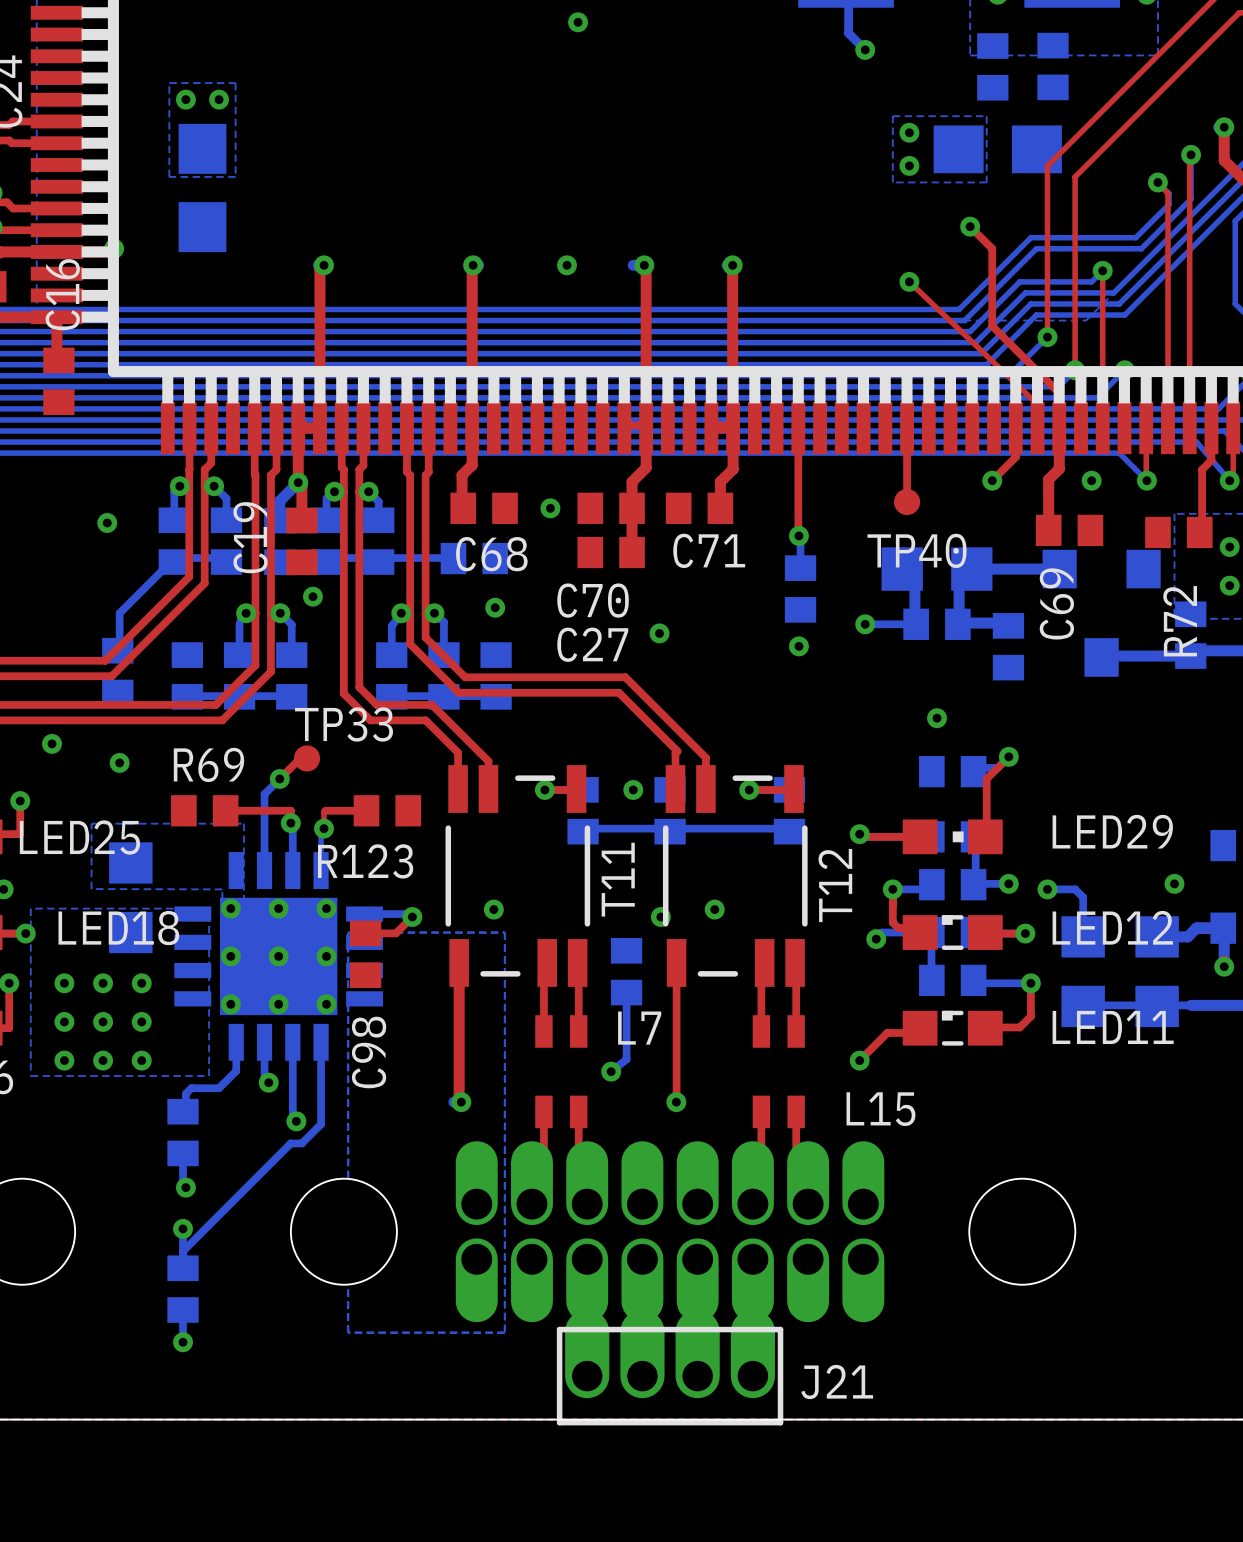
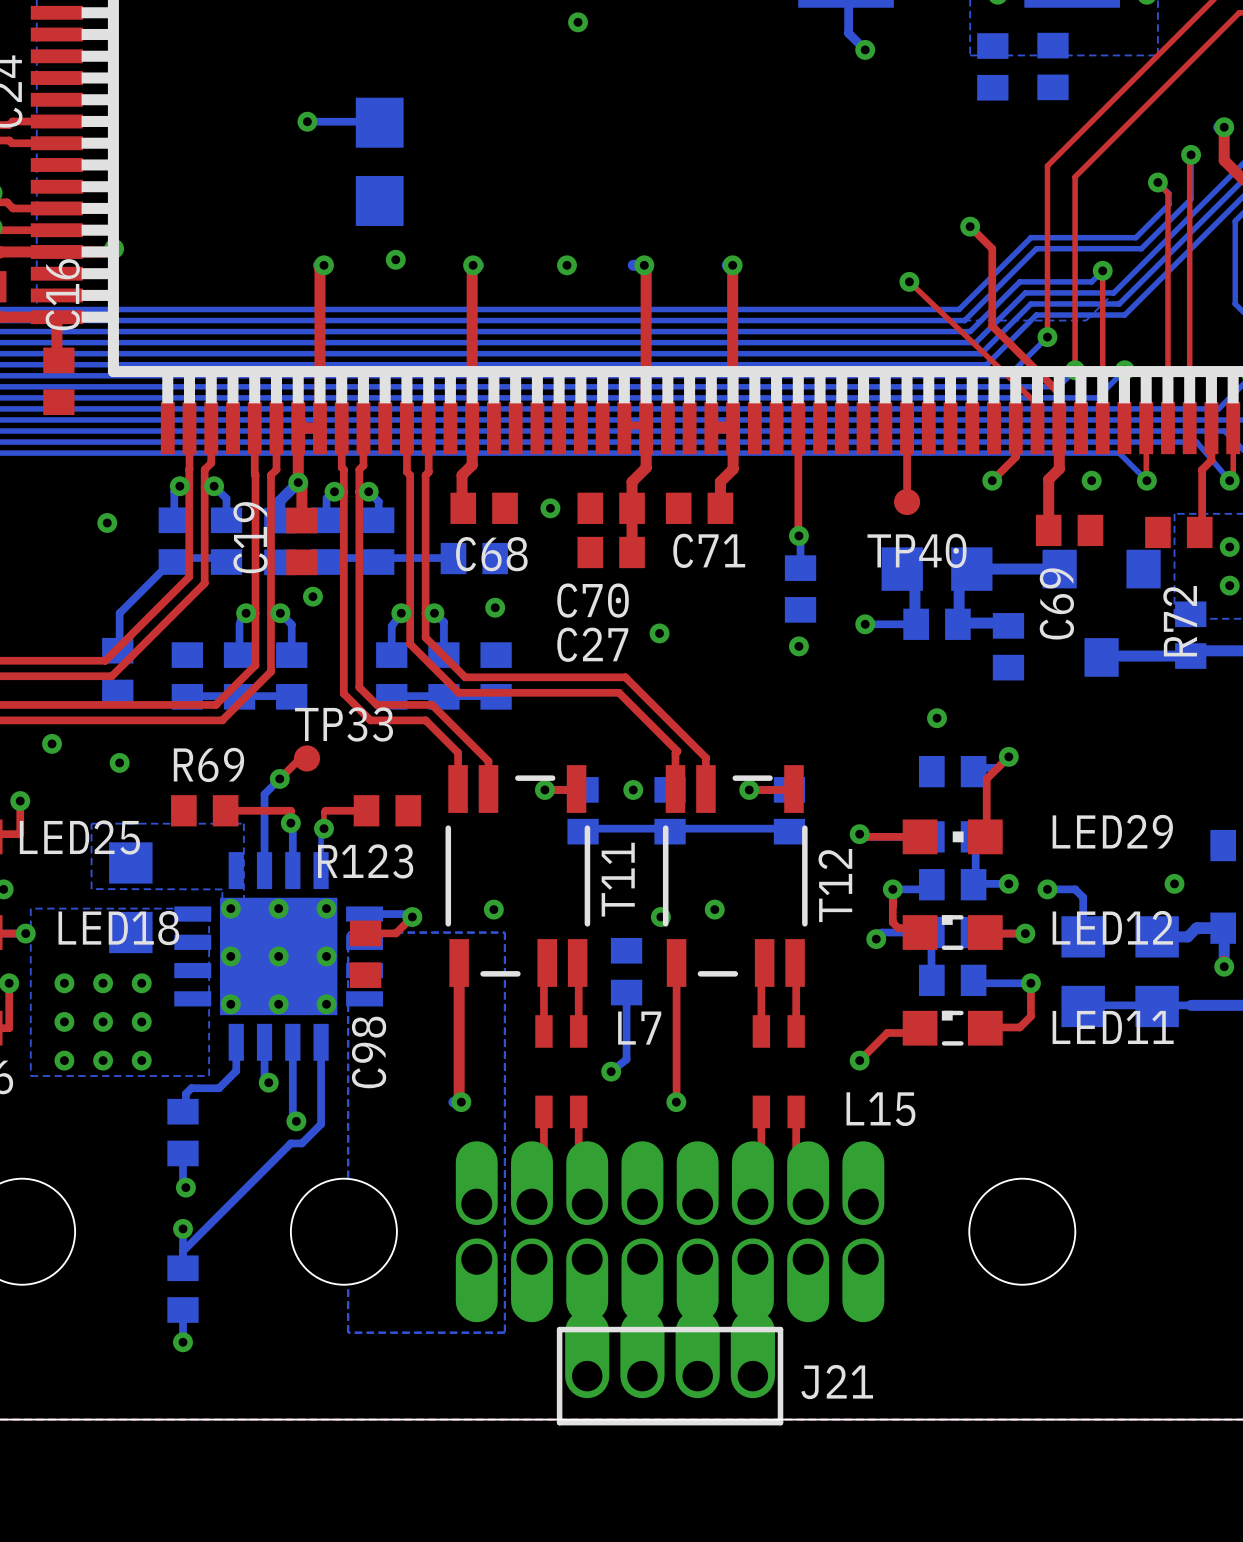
bottom zone outline: (169, 83) (169, 176) (235, 176) (235, 83) (169, 83) -> none
via: (185, 99) -> none
via: (219, 99) -> none
bottom zone outline: (892, 116) (892, 182) (986, 182) (986, 116) (892, 116) -> none
bottom track: none -> (307, 121) (379, 122)
via: none -> (307, 121)
via: (909, 132) -> none
part: (997, 149) -> none
via: (909, 165) -> none
part position: (202, 188) -> (379, 161)
via: none -> (395, 259)

